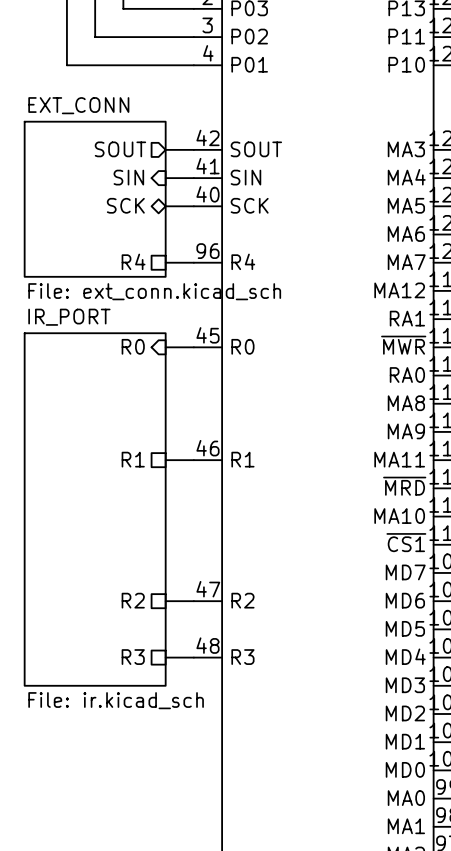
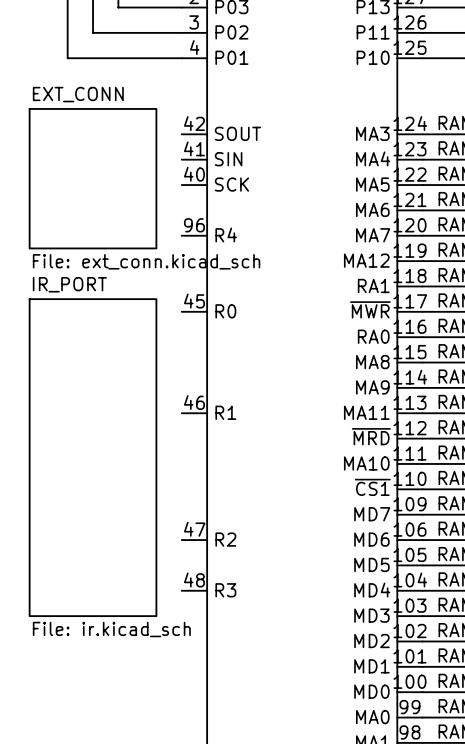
sheet pin: SOUT (120, 149) -> none
wire: (165, 149) (193, 149) -> none
sheet pin: SIN (128, 177) -> none
wire: (165, 178) (193, 178) -> none
sheet pin: SCK (125, 205) -> none
wire: (165, 206) (193, 206) -> none
sheet pin: R4 (133, 261) -> none
wire: (165, 262) (193, 262) -> none
sheet pin: R0 (133, 346) -> none
wire: (165, 347) (193, 347) -> none
sheet pin: R1 (133, 459) -> none
wire: (165, 460) (193, 460) -> none
sheet pin: R2 (133, 600) -> none
wire: (165, 601) (193, 601) -> none
sheet pin: R3 (133, 657) -> none
wire: (165, 657) (193, 657) -> none

